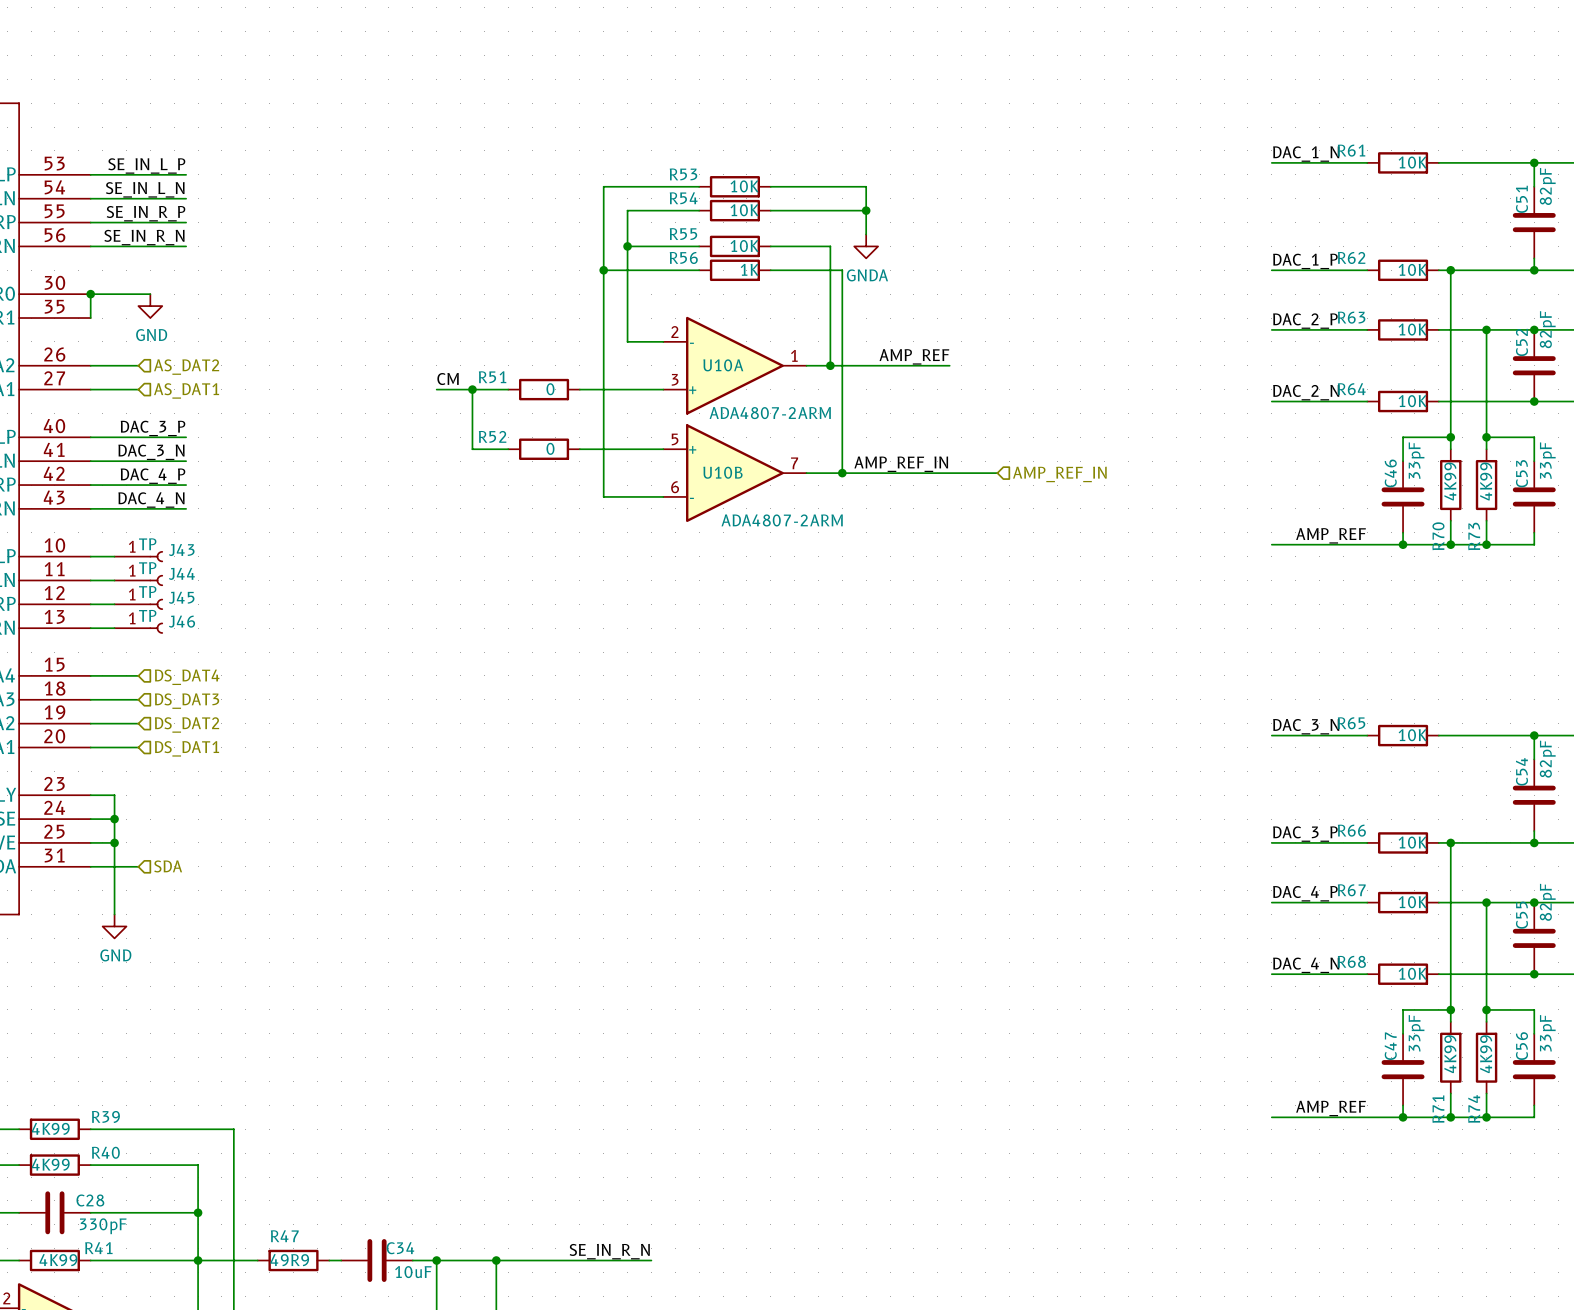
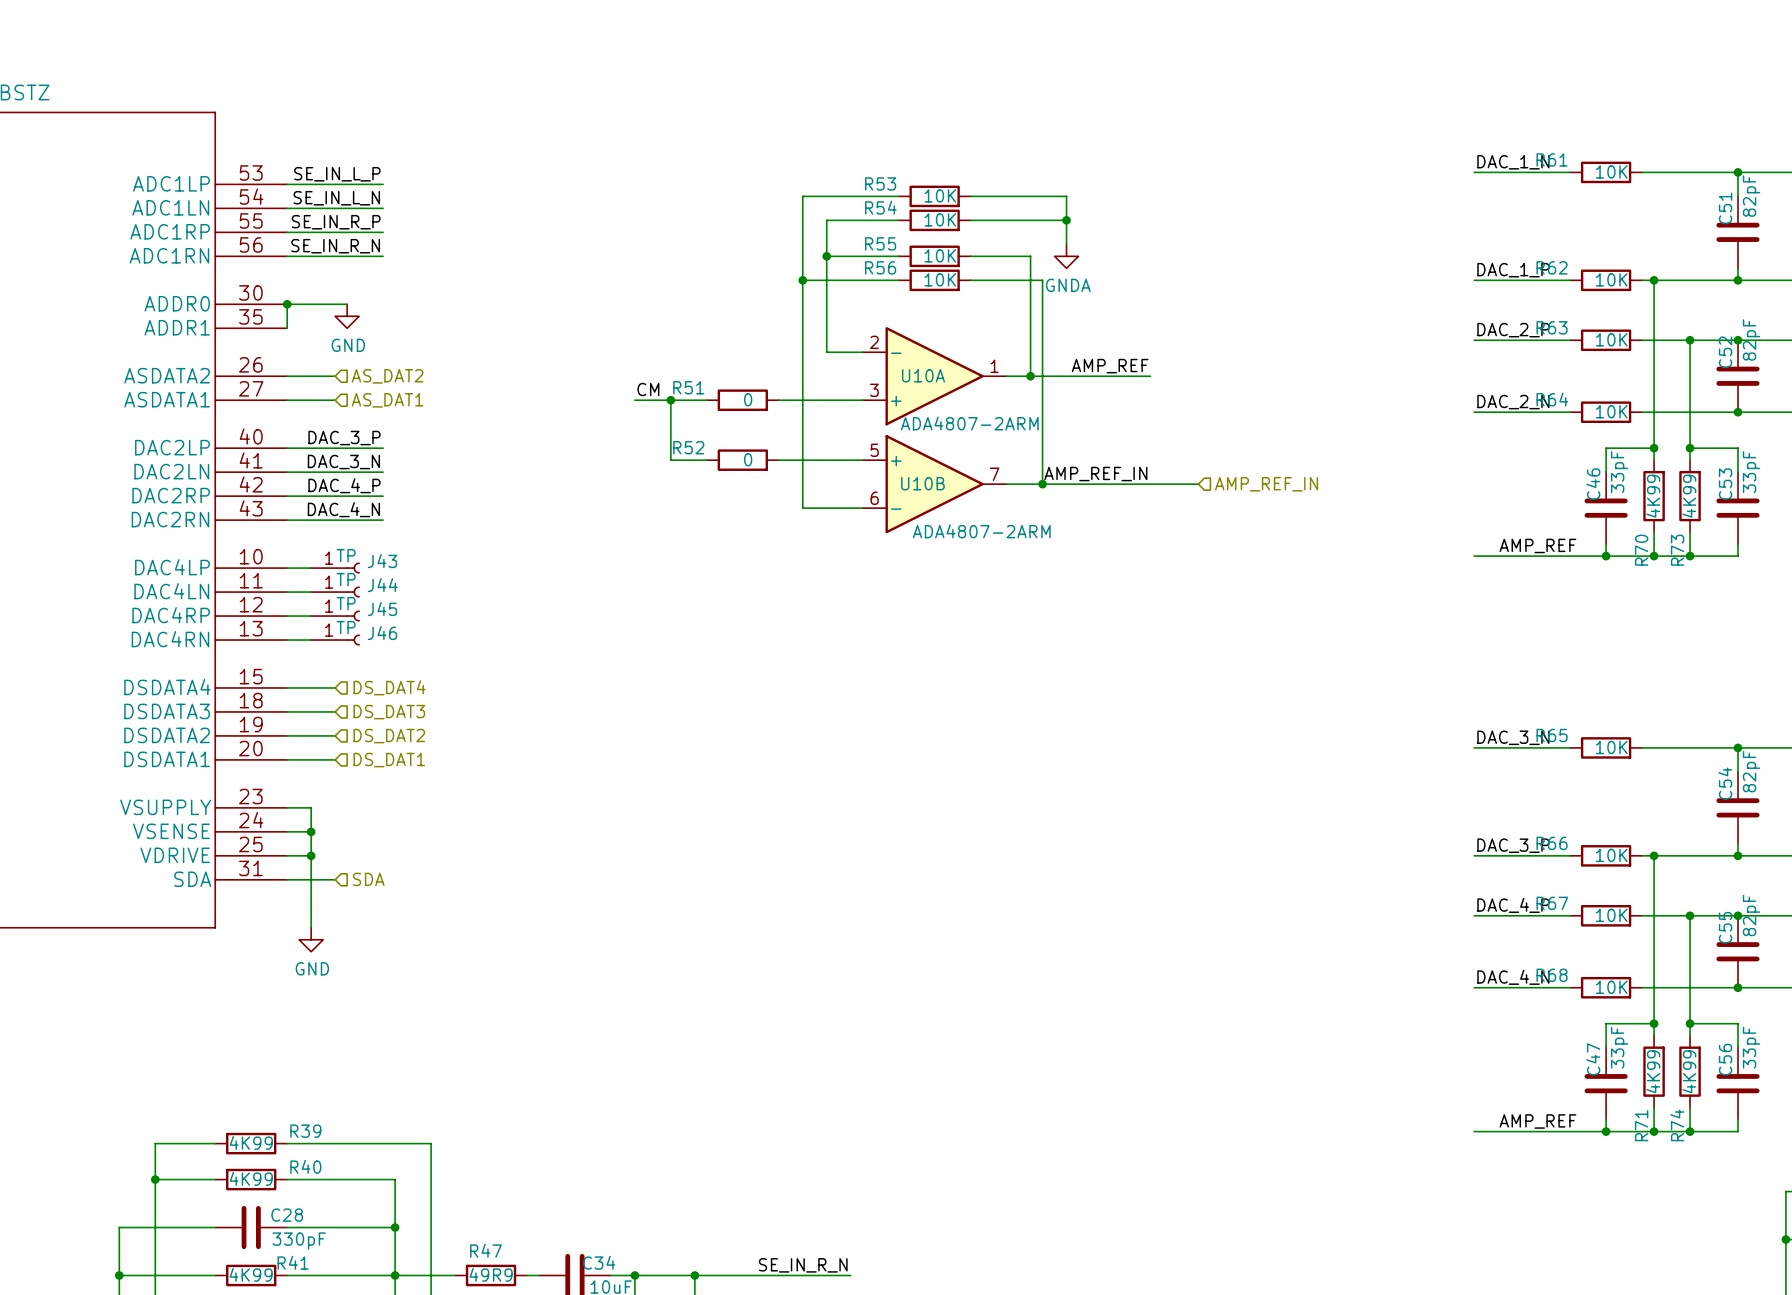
R56 value: 1K (749, 269) -> 10K (940, 279)

